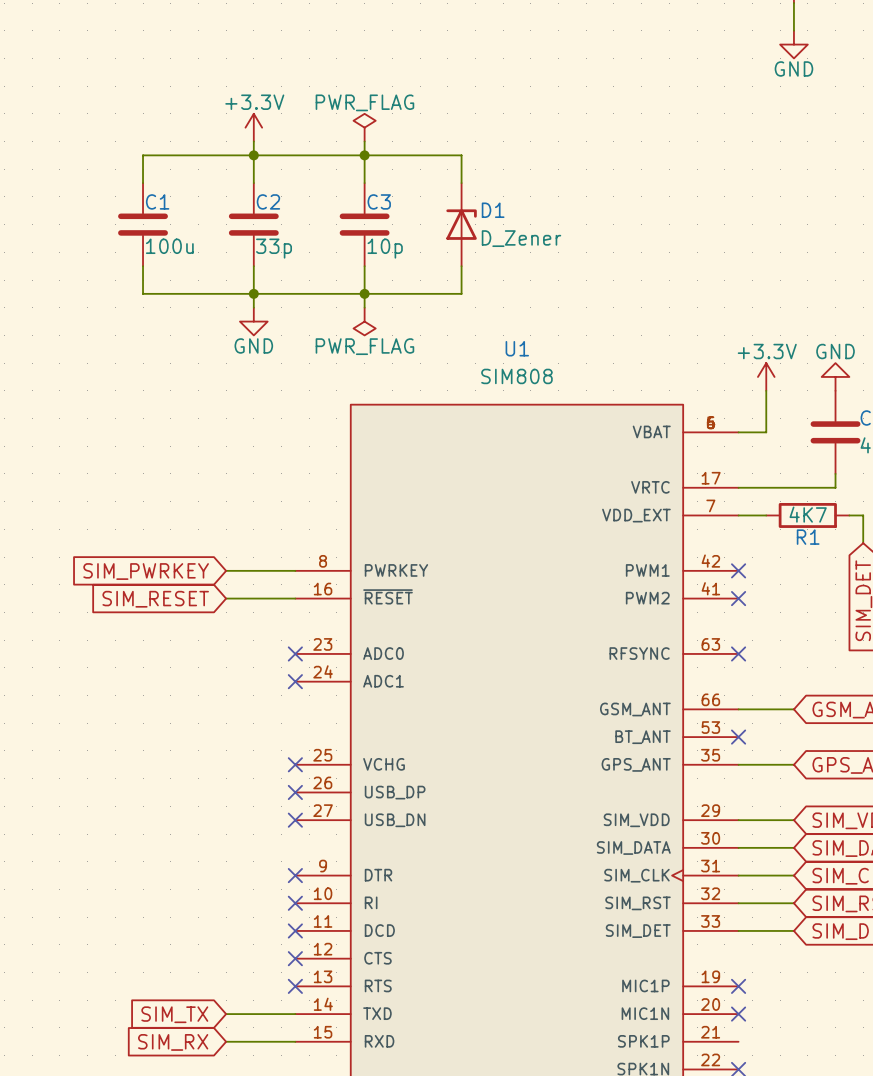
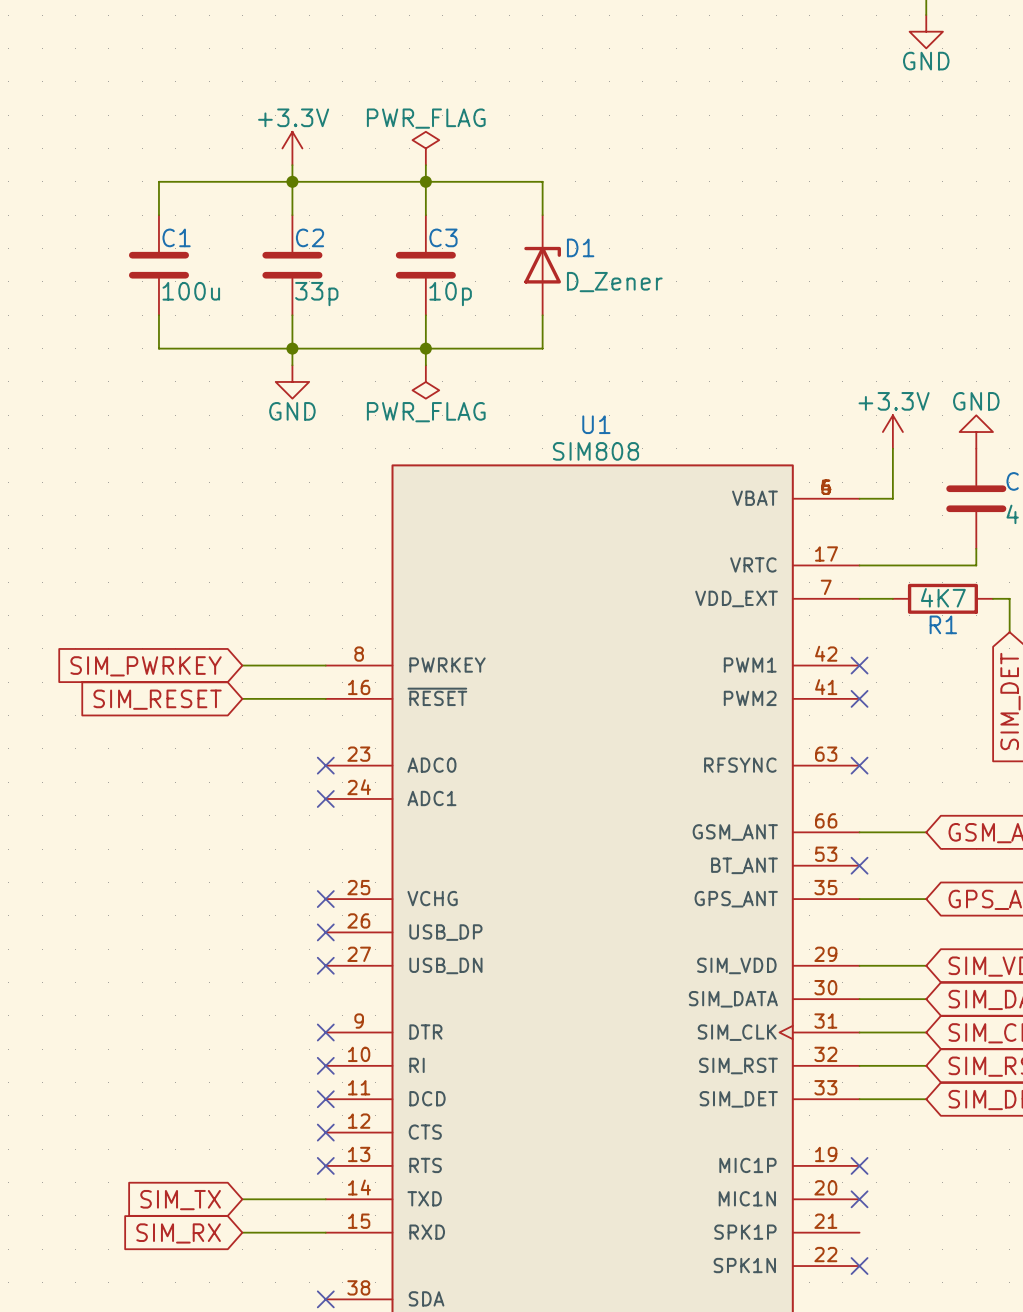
power symbol position: +3.3V (253, 127) -> +3.3V (292, 148)
power symbol position: PWR_FLAG (364, 127) -> PWR_FLAG (425, 148)
wire: (253, 141) (253, 183) -> (292, 165) (292, 215)
wire: (364, 141) (364, 183) -> (425, 165) (425, 215)
junction position: (253, 155) -> (292, 181)
junction position: (364, 155) -> (425, 181)
wire: (143, 183) (143, 155) (461, 155) (461, 183) -> (158, 215) (158, 181) (542, 181) (542, 215)
C1 position: (143, 224) -> (158, 265)
C2 position: (253, 224) -> (292, 265)
C3 position: (364, 224) -> (425, 265)
D1 position: (461, 224) -> (542, 265)
wire: (143, 266) (143, 293) (461, 293) (461, 266) -> (158, 315) (158, 348) (542, 348) (542, 315)
wire: (253, 266) (253, 307) -> (292, 315) (292, 365)
wire: (364, 266) (364, 307) -> (425, 315) (425, 365)
junction position: (253, 293) -> (292, 348)
junction position: (364, 293) -> (425, 348)
power symbol position: GND (253, 321) -> GND (292, 381)
power symbol position: PWR_FLAG (364, 321) -> PWR_FLAG (425, 381)
U1 name position: U1 (517, 348) -> U1 (596, 424)
U1 value position: SIM808 (516, 376) -> SIM808 (596, 451)

